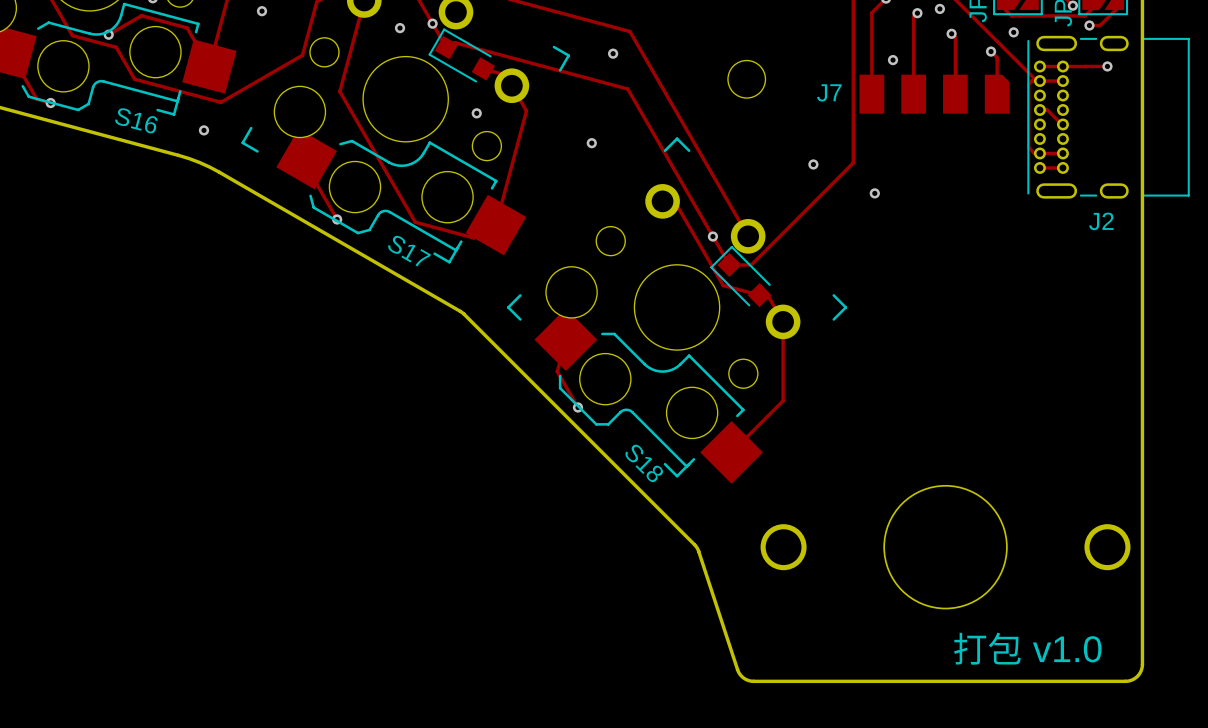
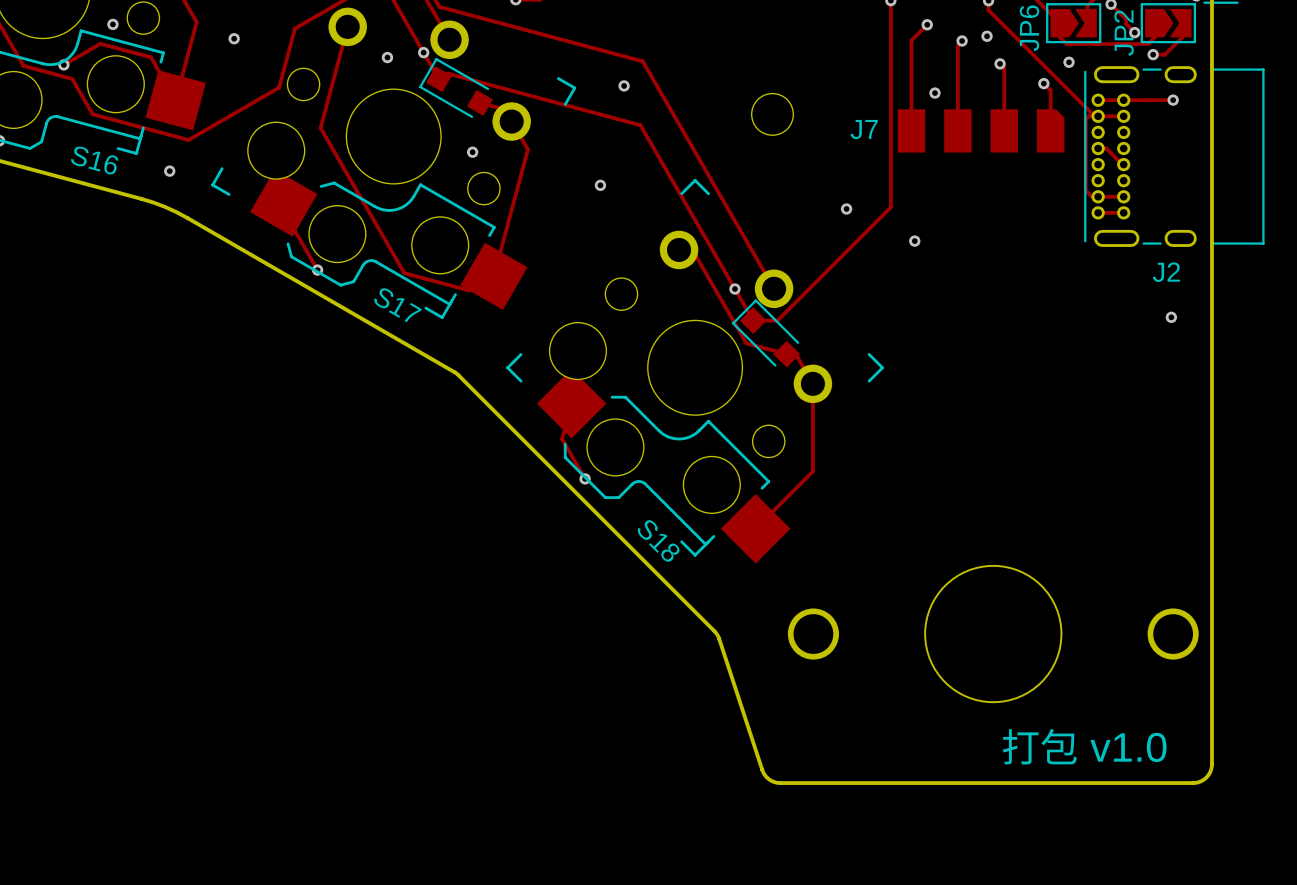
via: none -> (1171, 317)

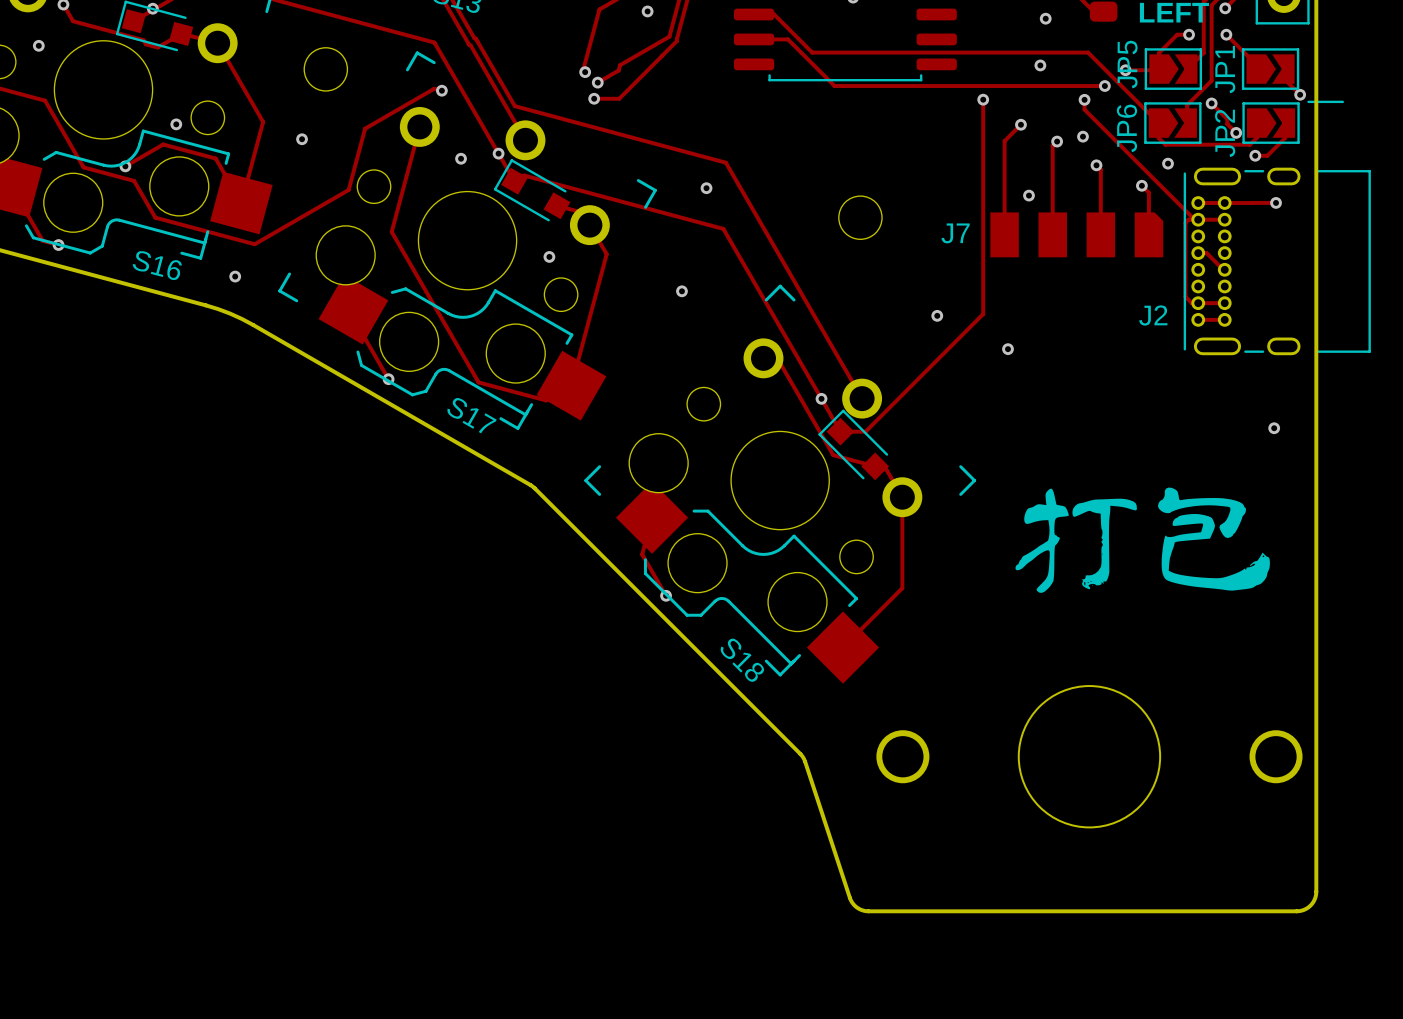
J2 name position: J2 (1166, 272) -> J2 (1153, 315)
drawing: none -> [1015, 487, 1270, 593]
text: 打包 v1.0 (1084, 746) -> none

